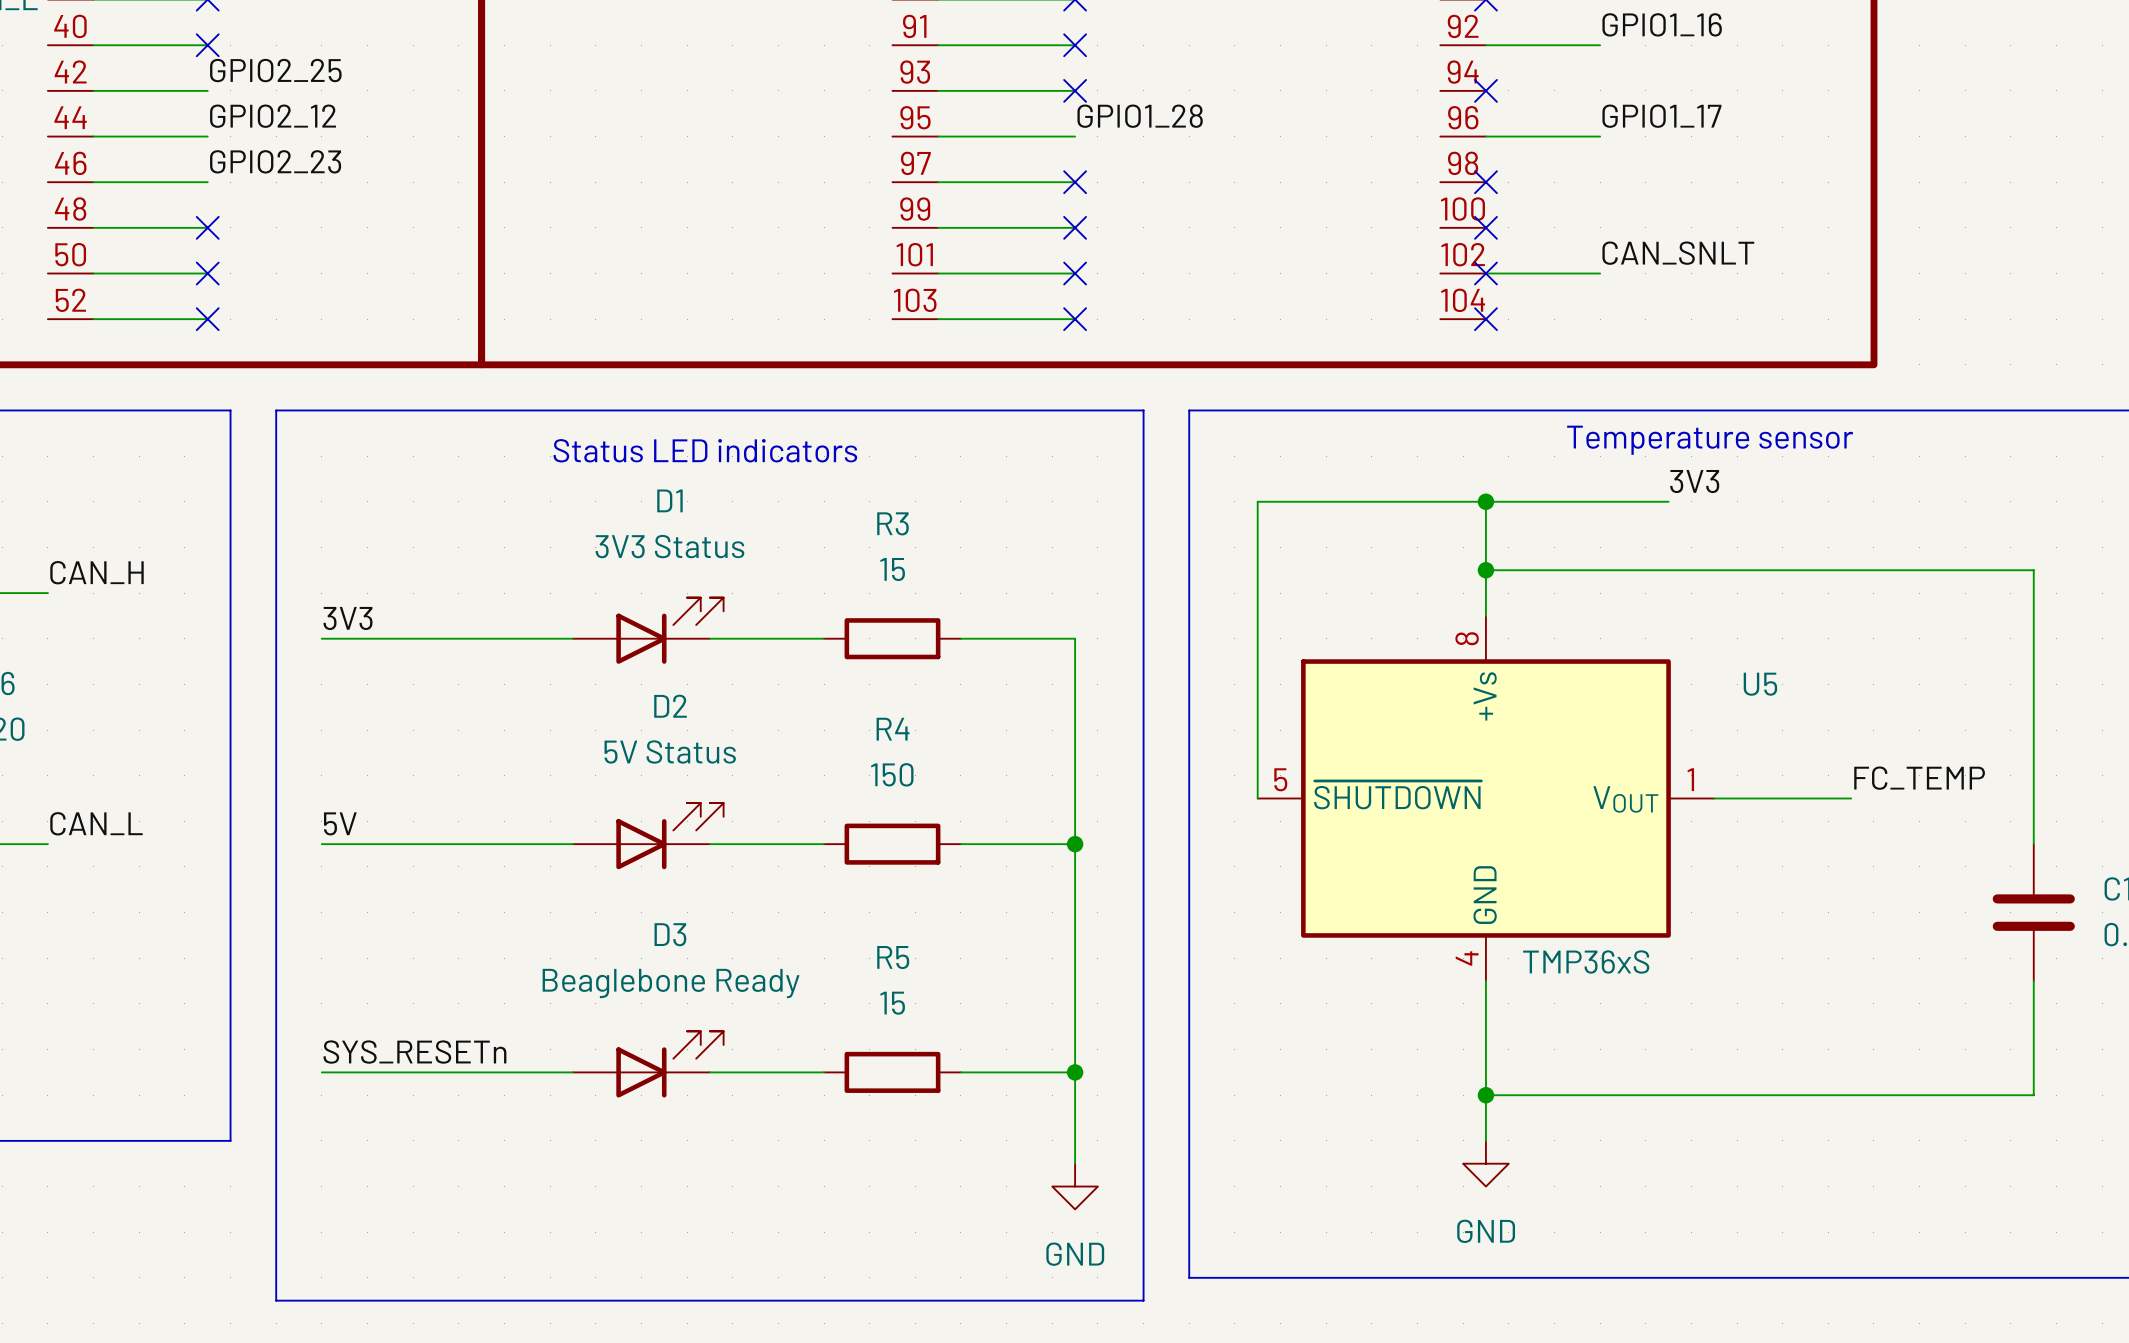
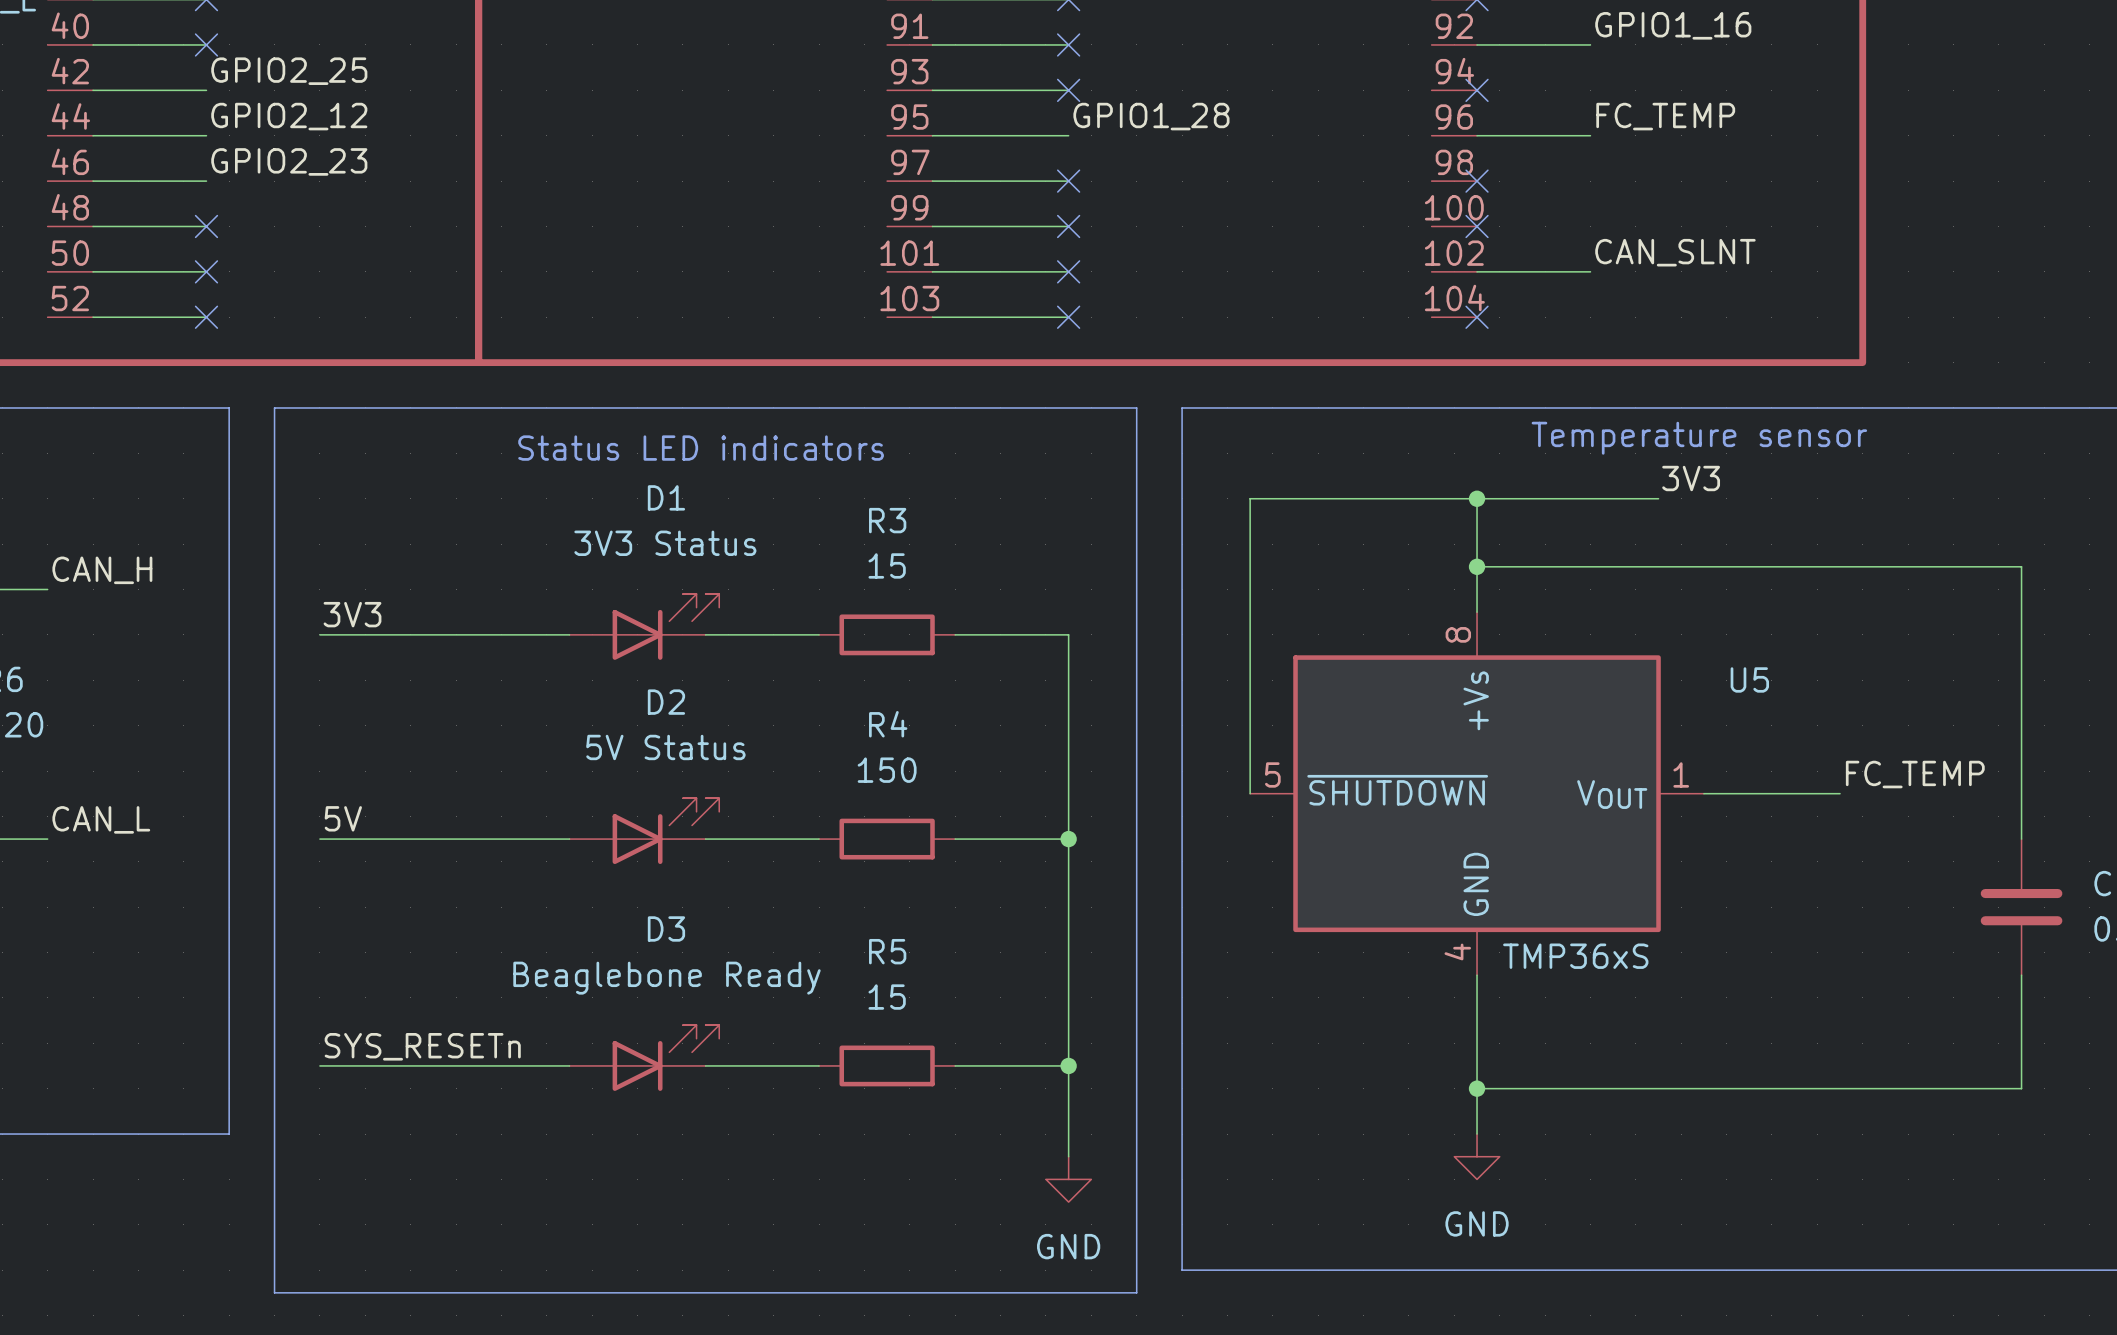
label: GPIO1_17 (1661, 116) -> FC_TEMP (1665, 116)
label: CAN_SNLT (1678, 253) -> CAN_SLNT (1675, 252)
no-connect mark: (1485, 273) -> none

